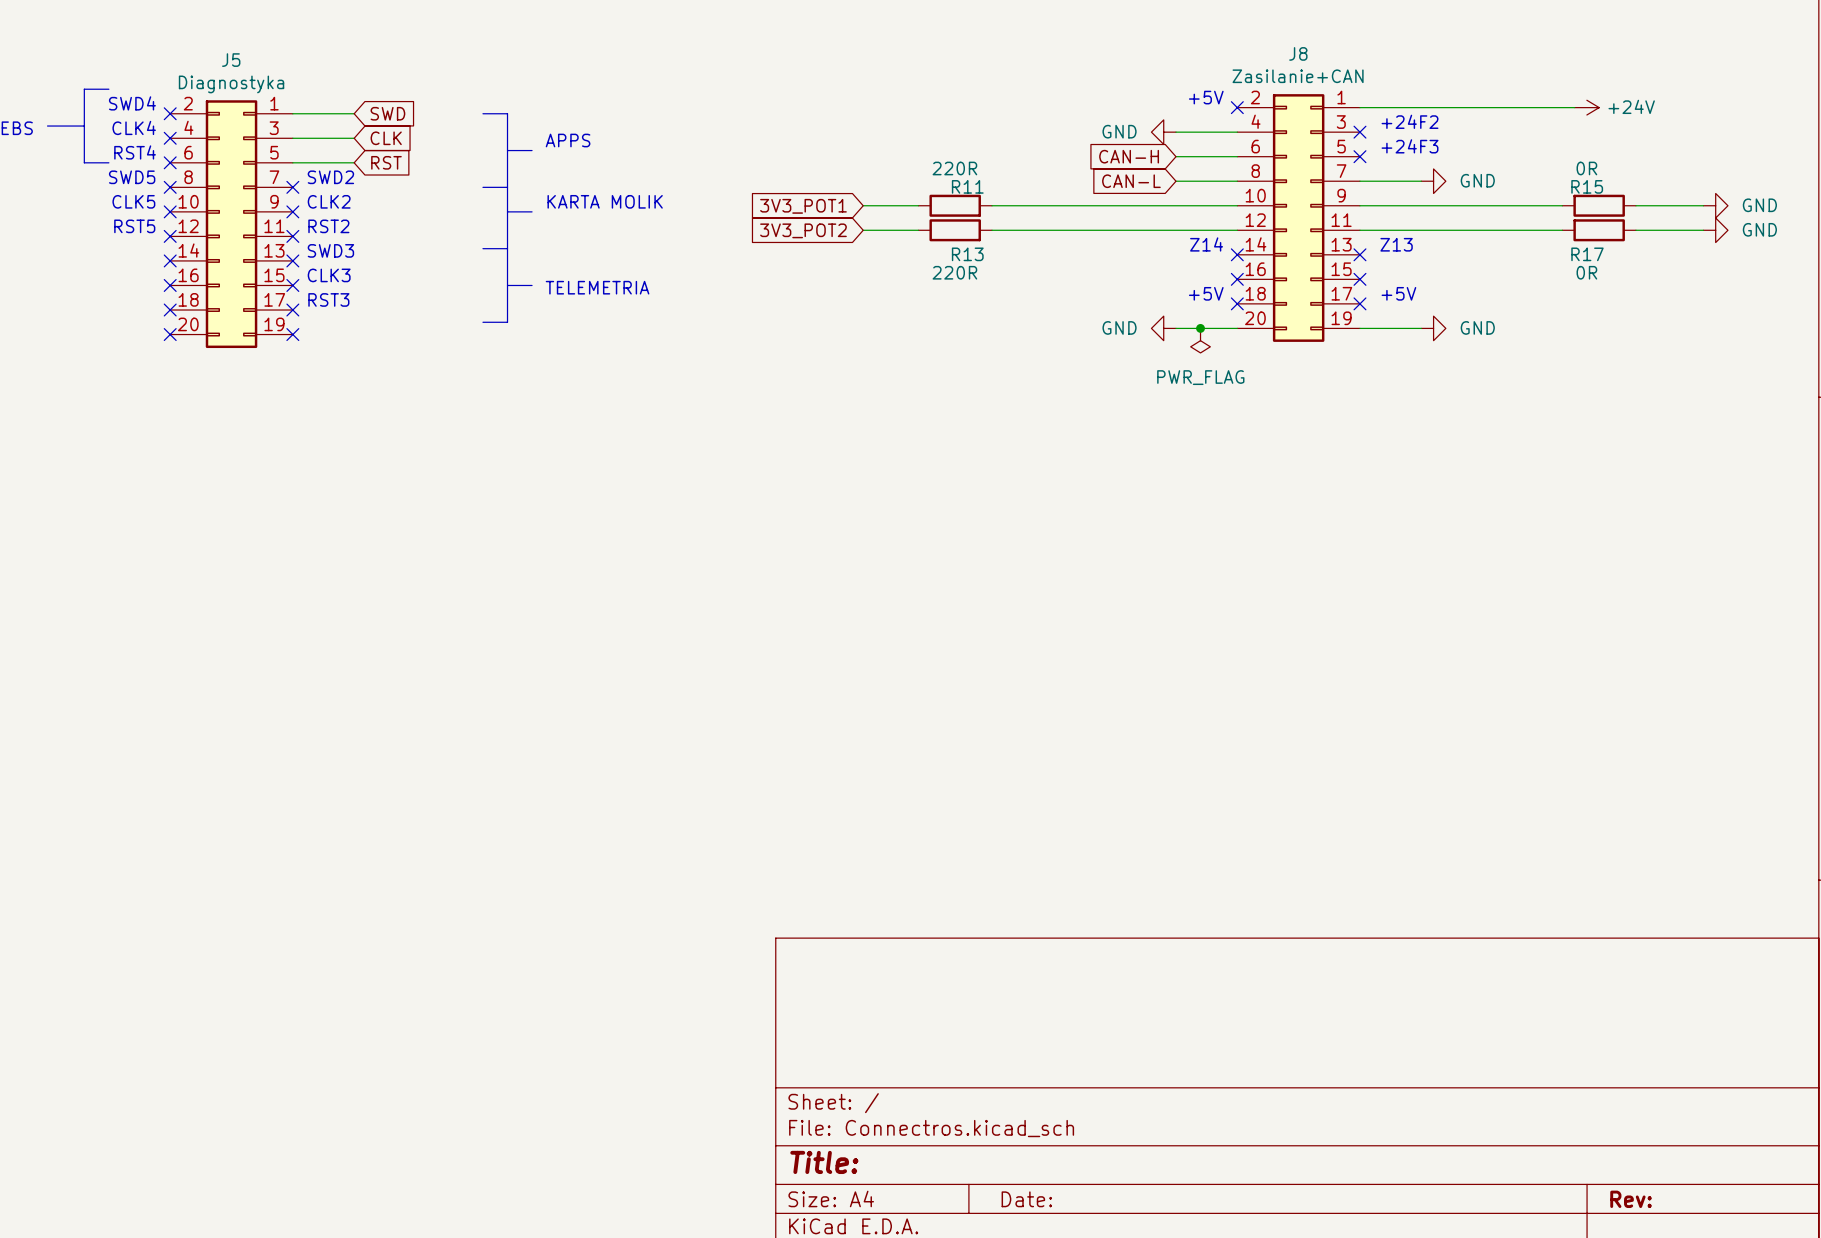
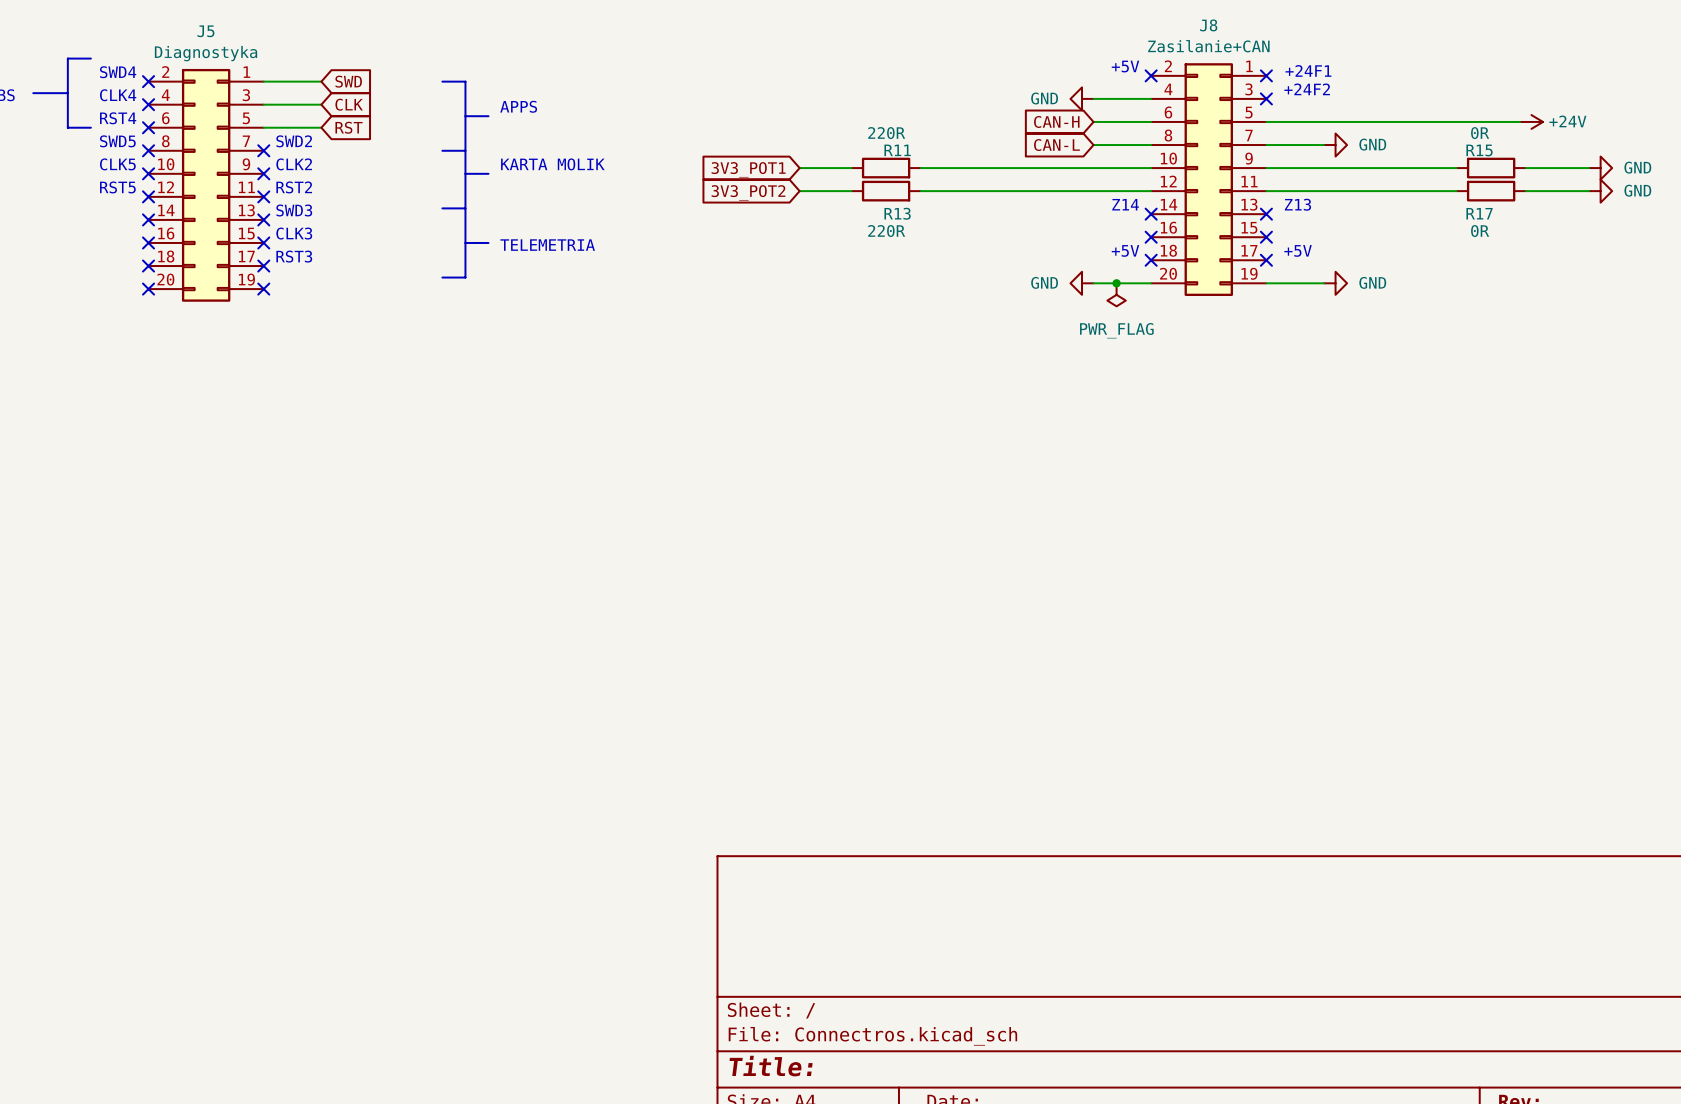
text: none -> +24F1 (1308, 70)
wire: (1359, 107) (1574, 107) -> none
power symbol position: +24V (1586, 107) -> +24V (1531, 121)
text: +24F3 (1410, 146) -> none
wire: none -> (1266, 121) (1519, 121)
no-connect mark position: (1359, 156) -> (1266, 75)

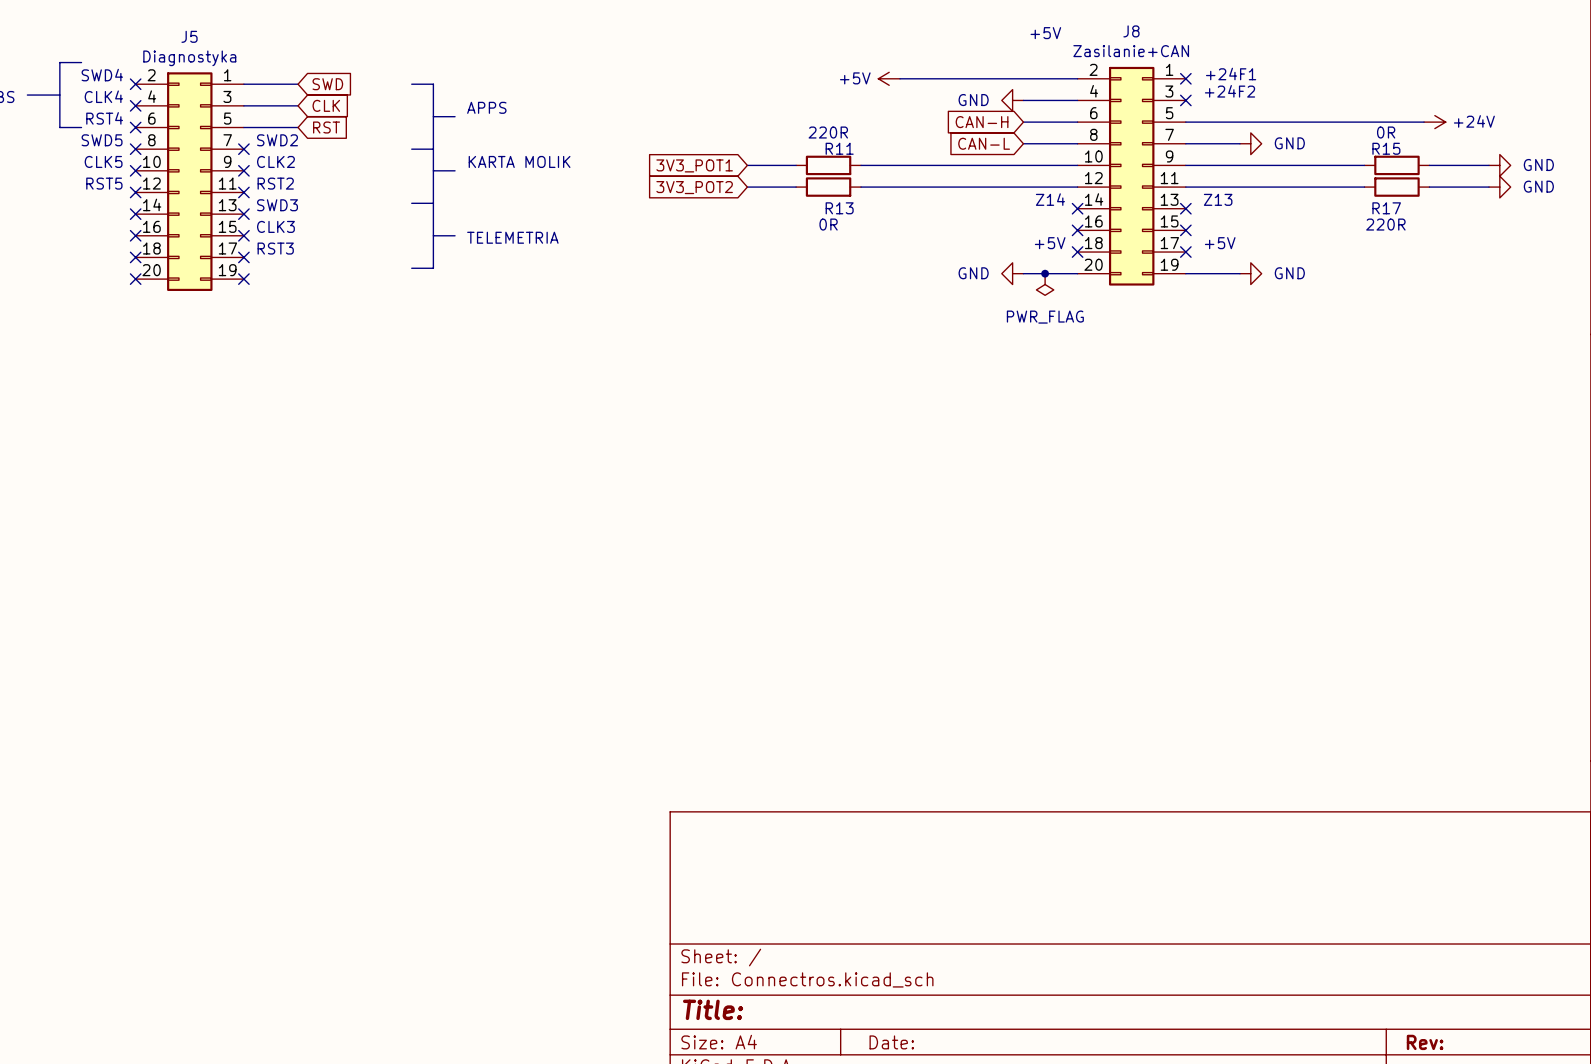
text position: +5V (1125, 66) -> +5V (1045, 33)
power symbol: none -> +5V (889, 78)
wire: none -> (900, 78) (1077, 78)
no-connect mark: (1151, 75) -> none
R13 value: 220R (886, 231) -> 0R (828, 224)
R17 value: 0R (1480, 231) -> 220R (1385, 224)

